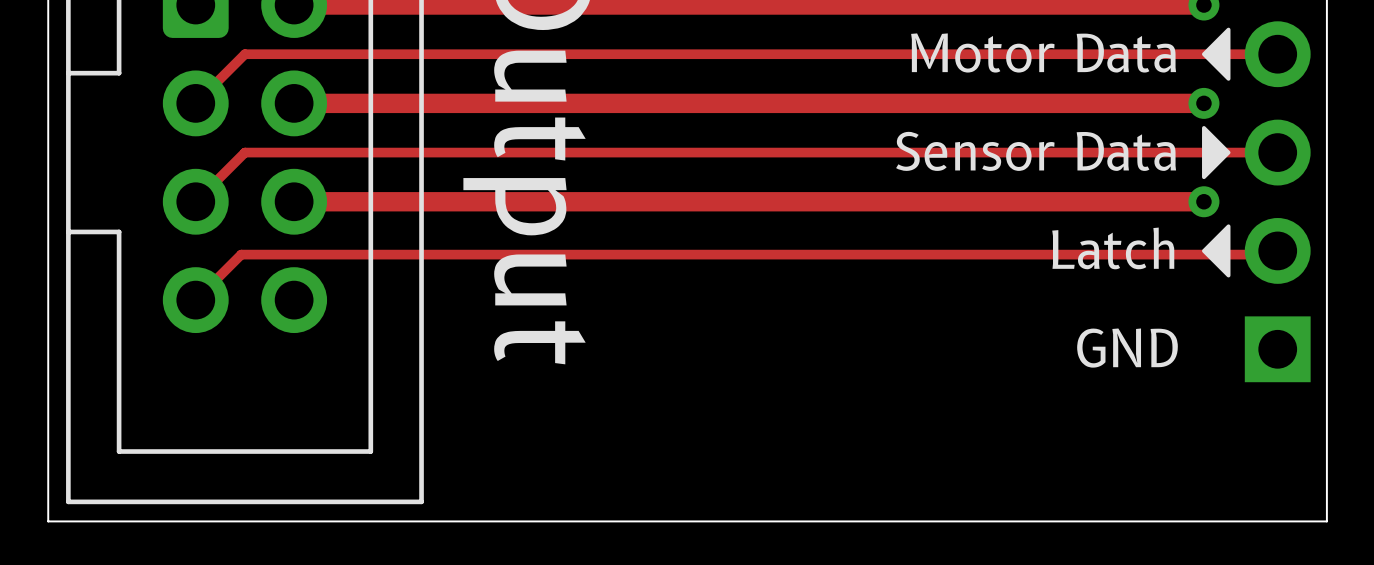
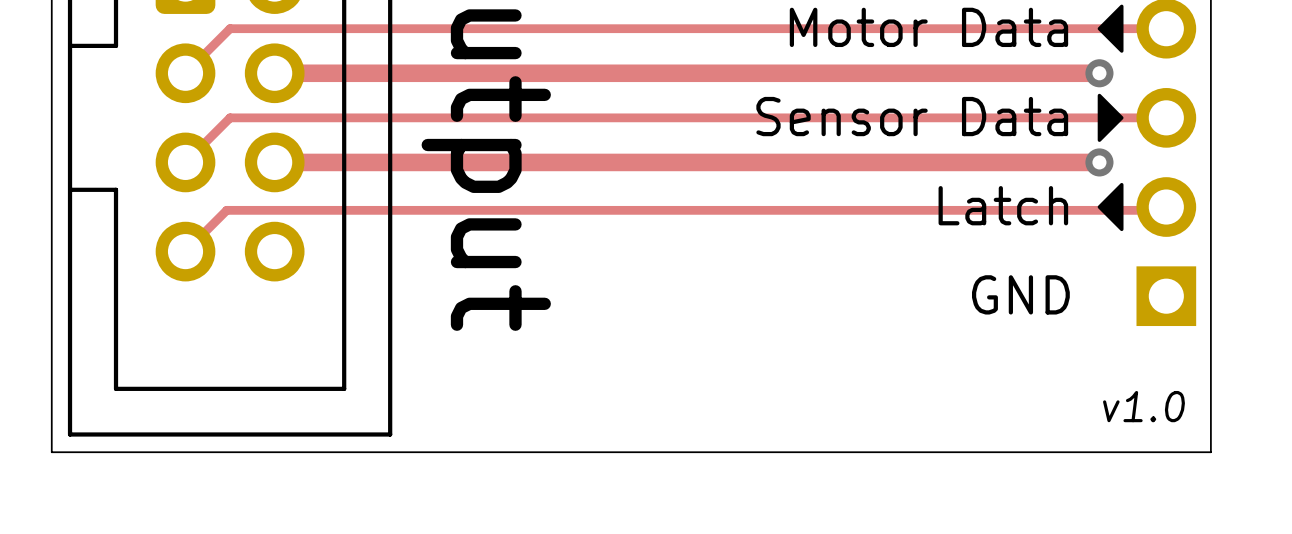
text: none -> v1.0 (1144, 406)

